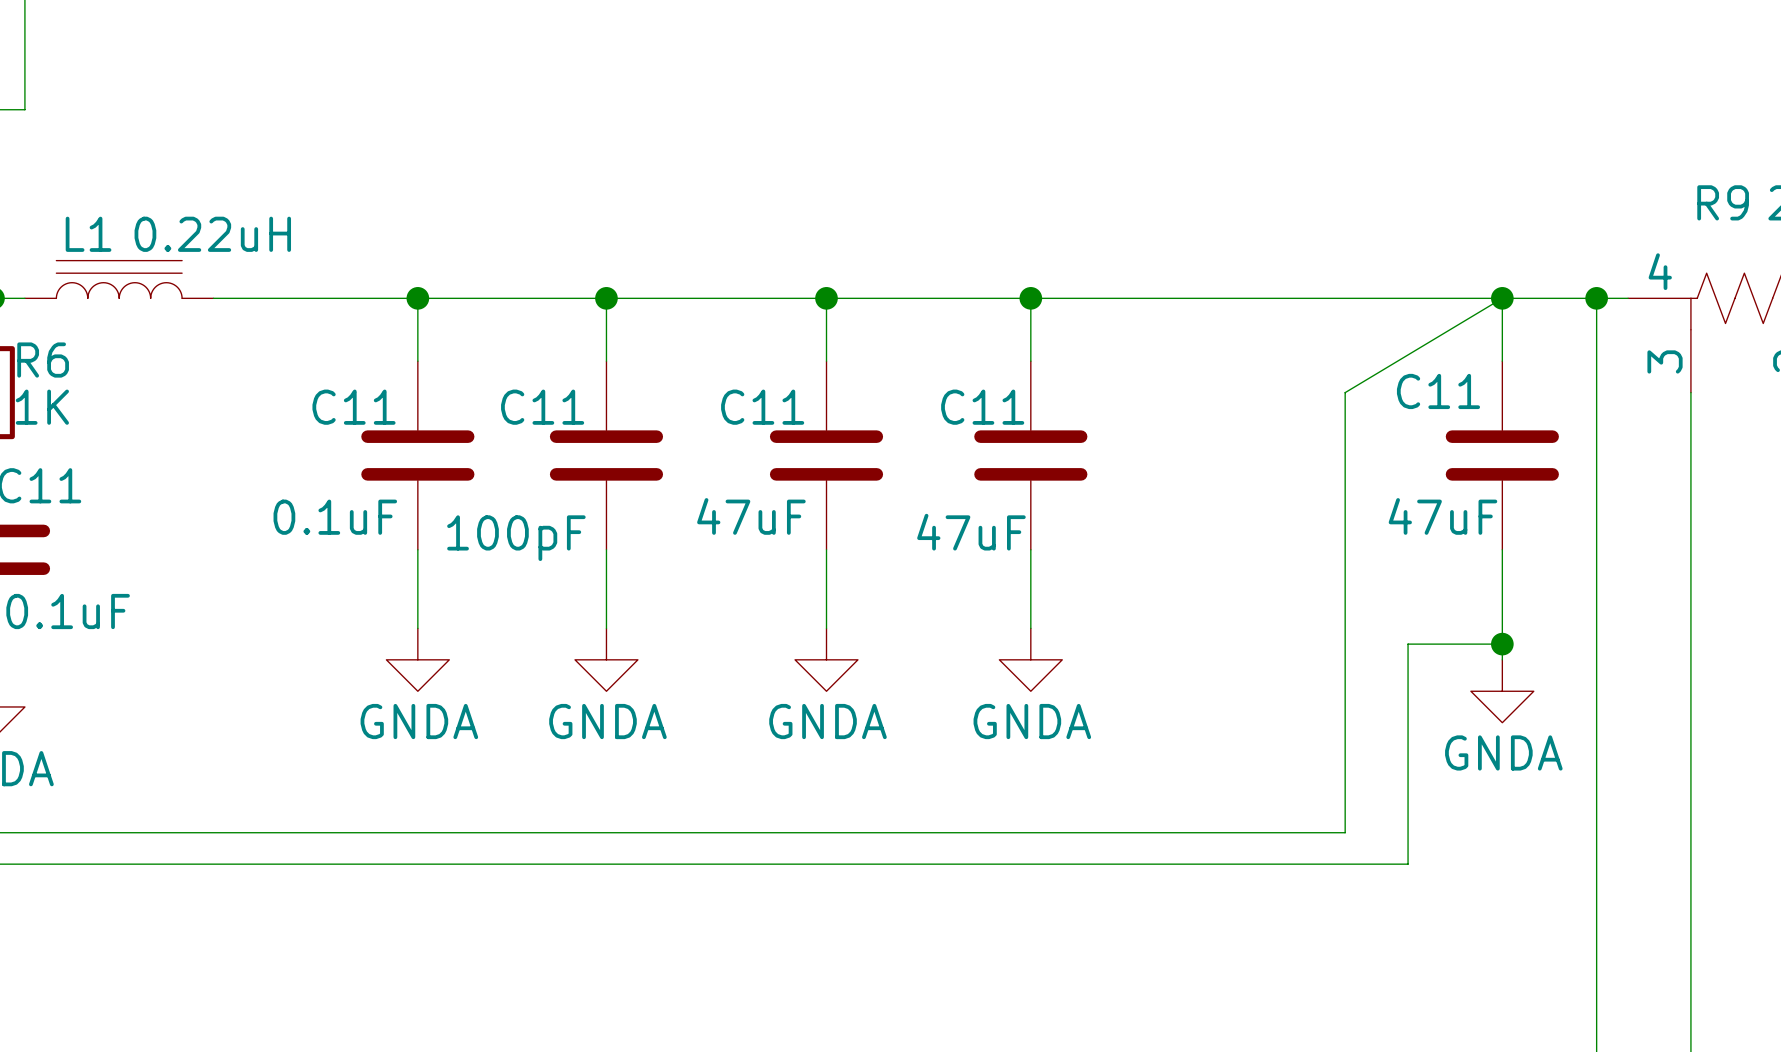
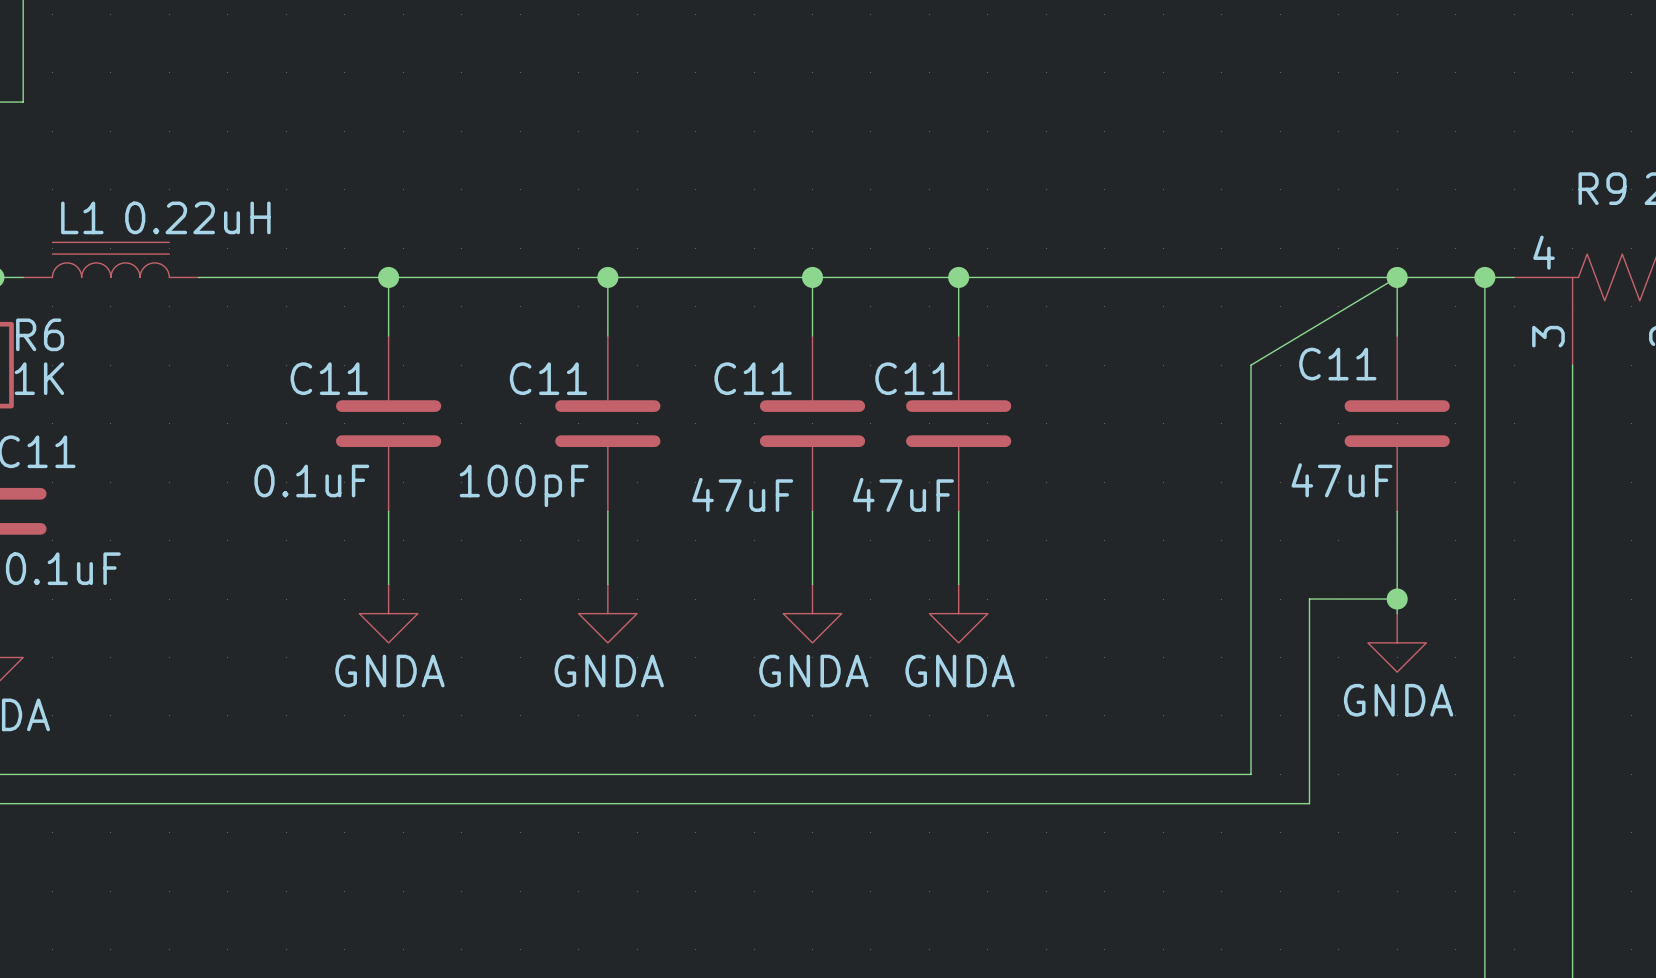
wire: (606, 298) (606, 361) -> (607, 277) (607, 335)
junction position: (606, 298) -> (607, 277)
wire: (826, 298) (826, 361) -> (812, 277) (812, 335)
junction position: (826, 298) -> (812, 277)
C11 position: (606, 455) -> (607, 423)
C11 position: (826, 455) -> (812, 423)
C11 value position: 47uF (751, 516) -> 47uF (742, 494)
C11 value position: 100pF (516, 538) -> 100pF (524, 485)
wire: (606, 549) (606, 628) -> (607, 511) (607, 584)
wire: (826, 549) (826, 628) -> (812, 511) (812, 584)
power symbol position: GNDA (606, 659) -> GNDA (607, 613)
power symbol position: GNDA (826, 659) -> GNDA (812, 613)

